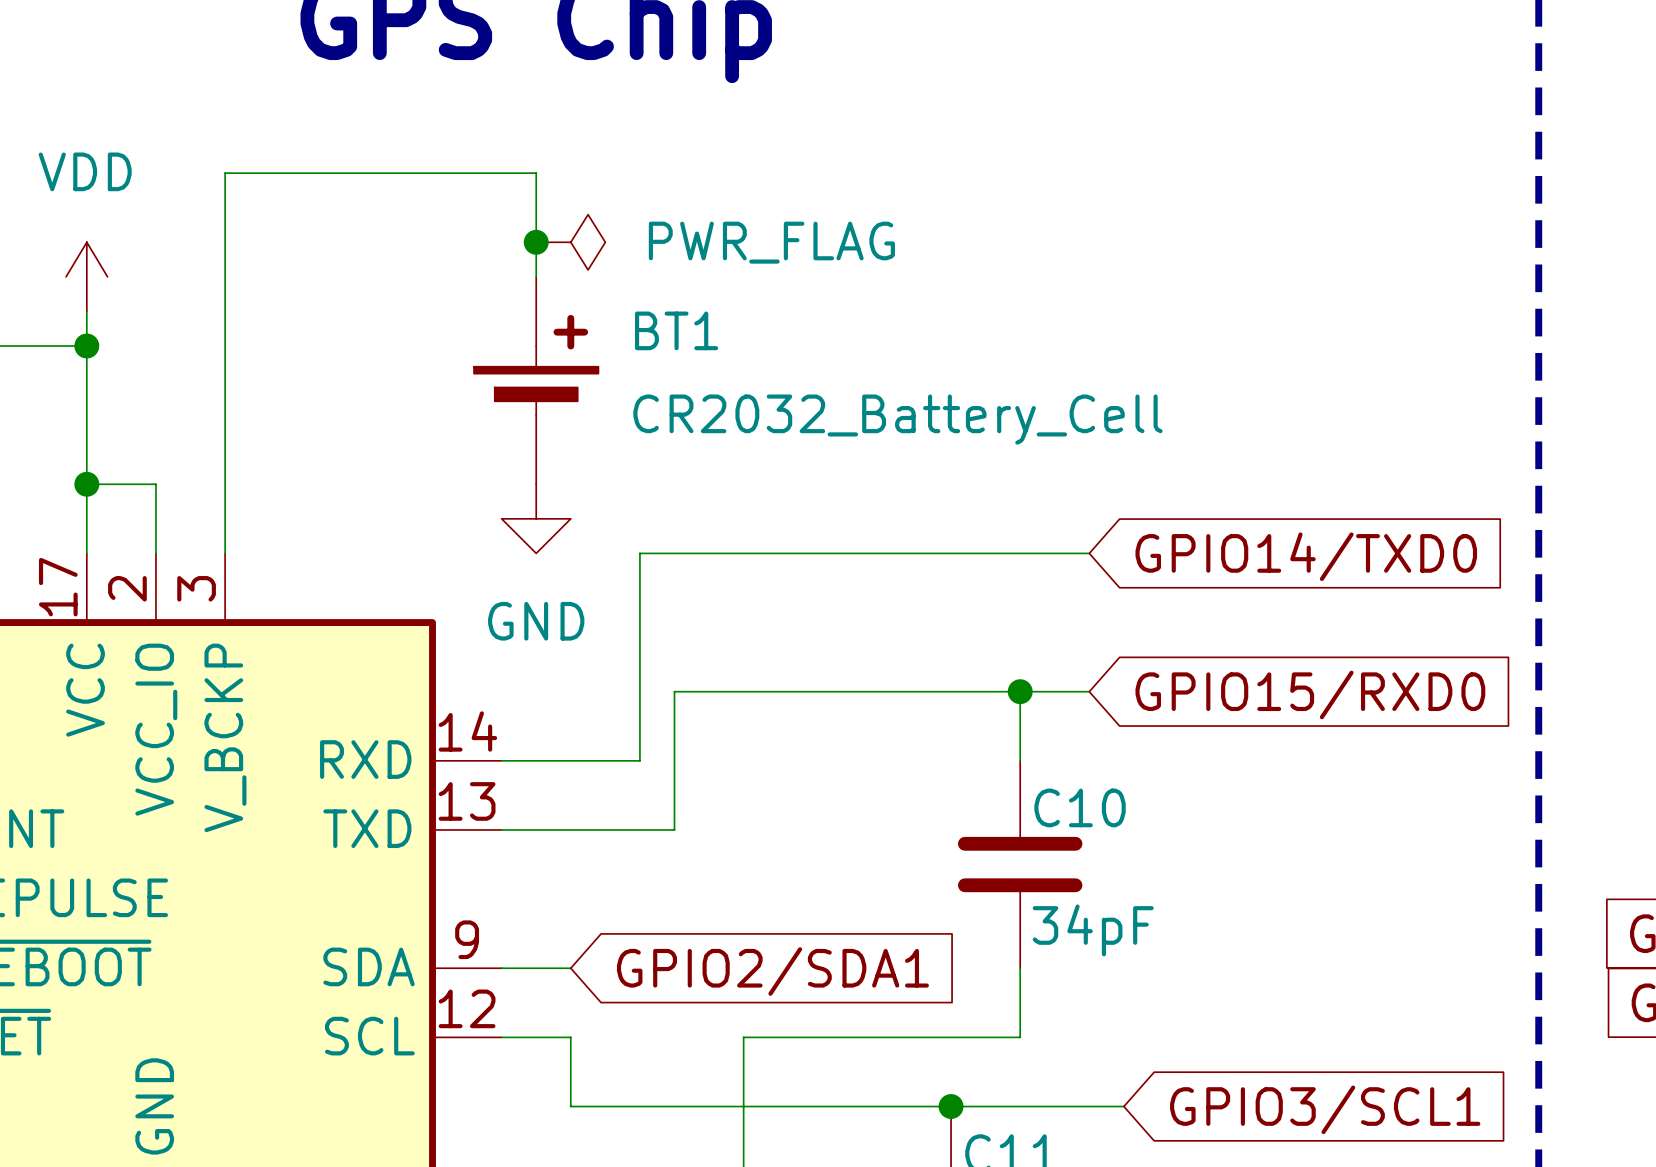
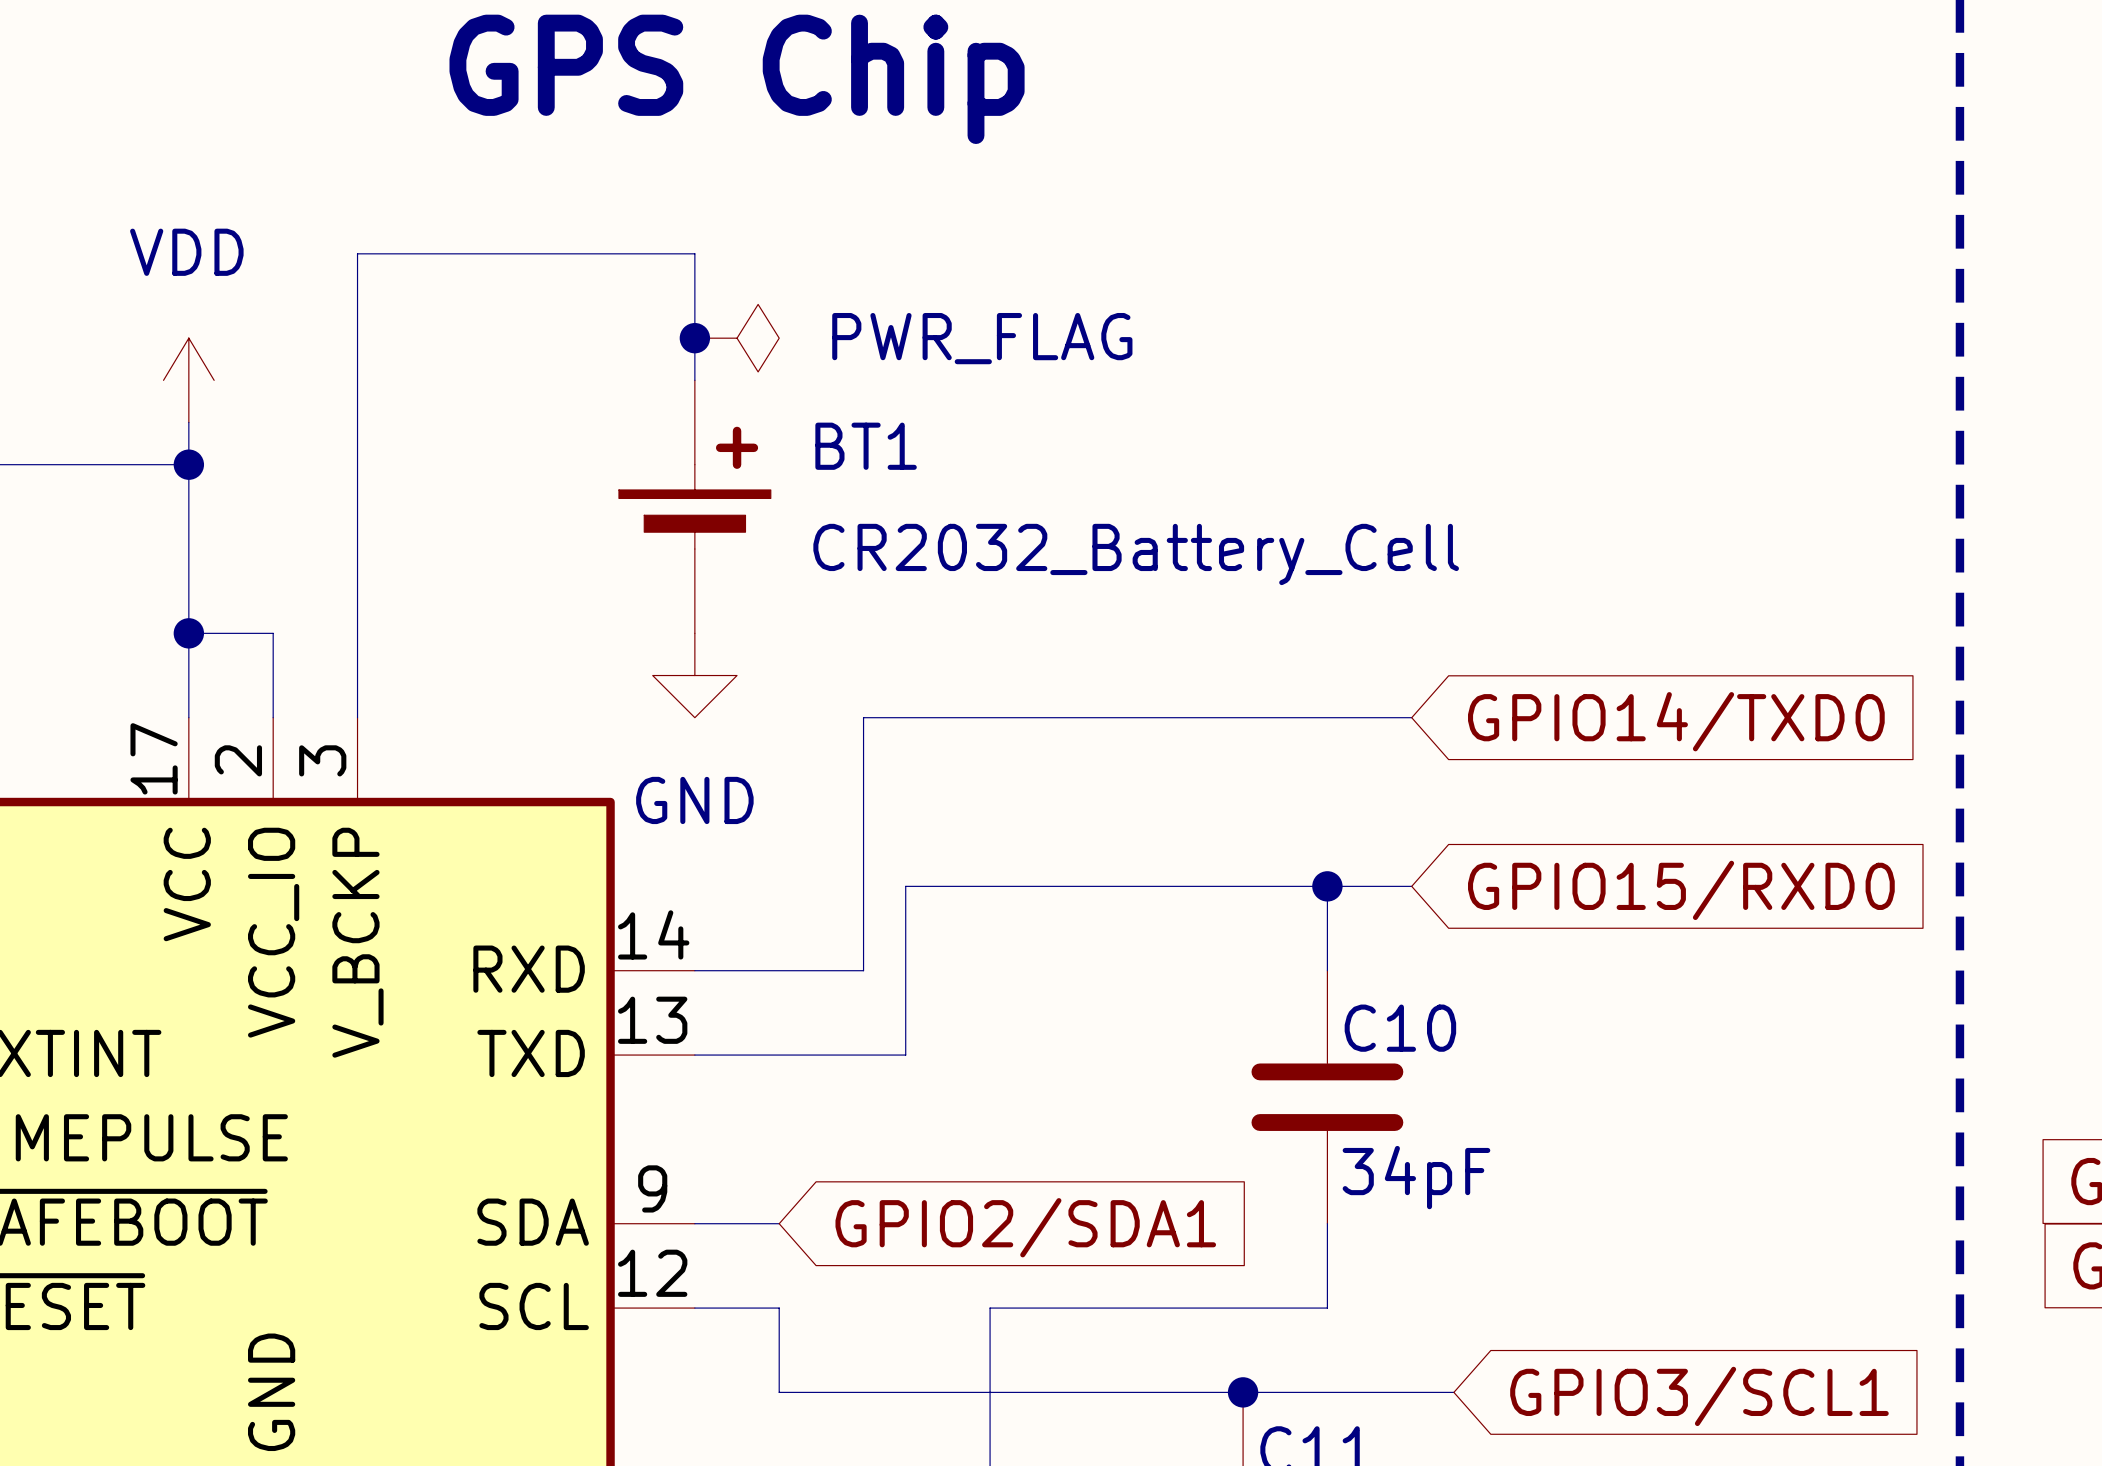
wire: (501, 173) (536, 173) (536, 276) -> (694, 253) (694, 380)
junction position: (536, 242) -> (694, 338)
power symbol position: PWR_FLAG (570, 242) -> PWR_FLAG (737, 338)
BT1 position: (536, 380) -> (694, 506)
power symbol position: GND (536, 518) -> GND (694, 675)

